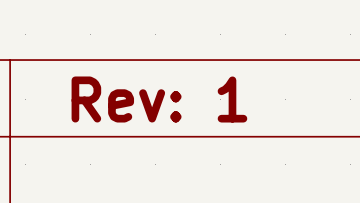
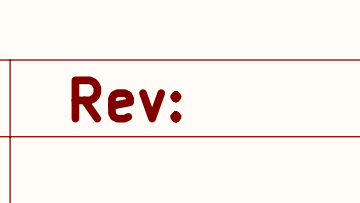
title block: Rev: 1 (159, 99) -> Rev: (126, 99)

